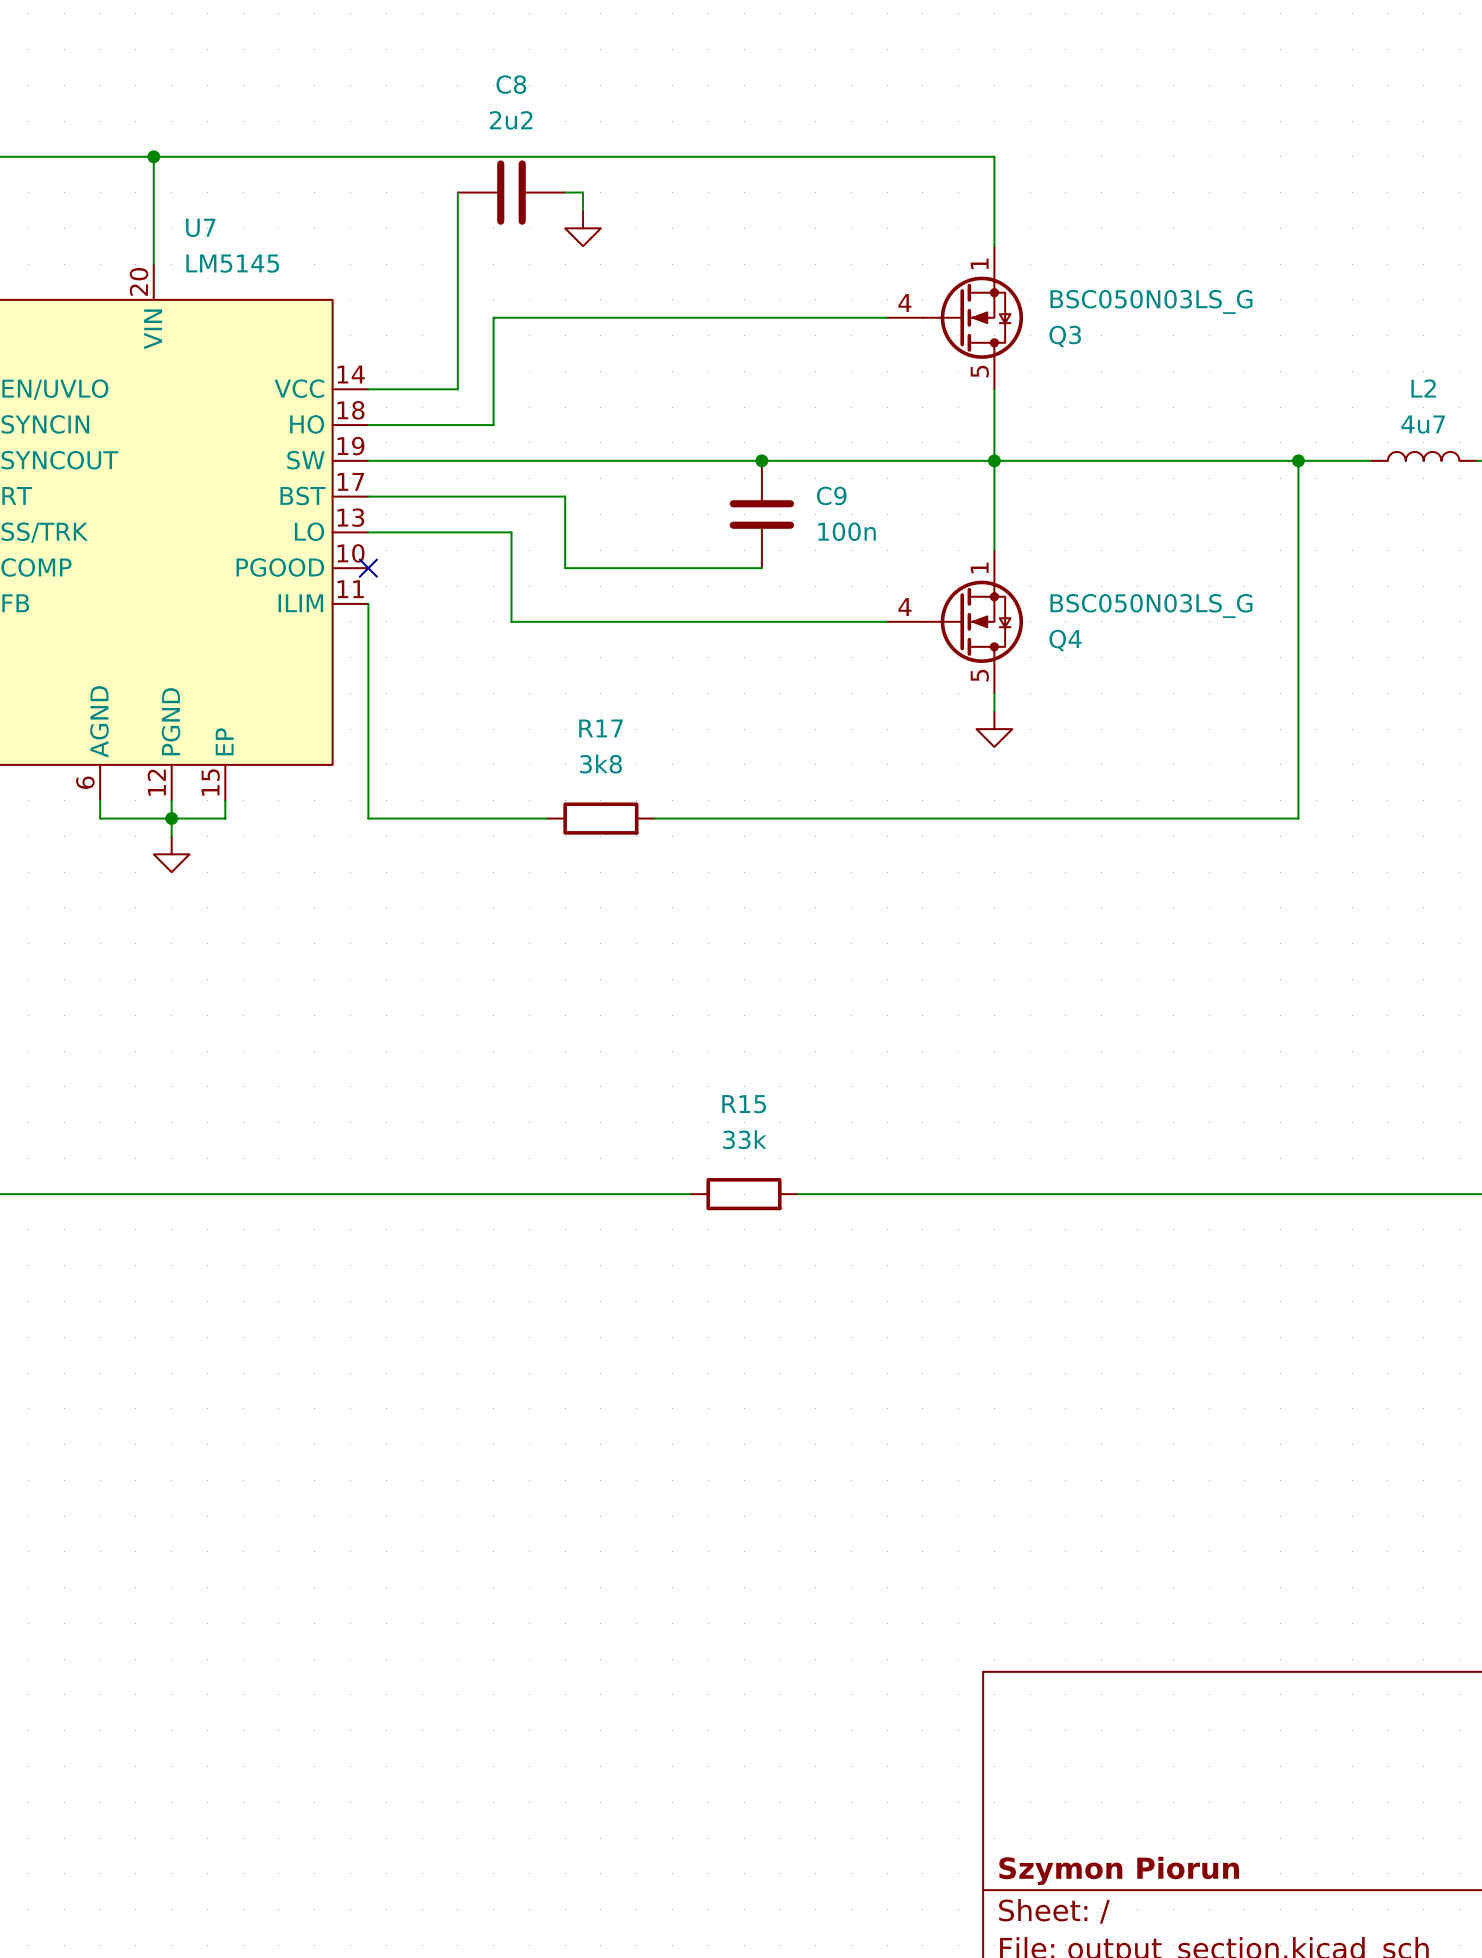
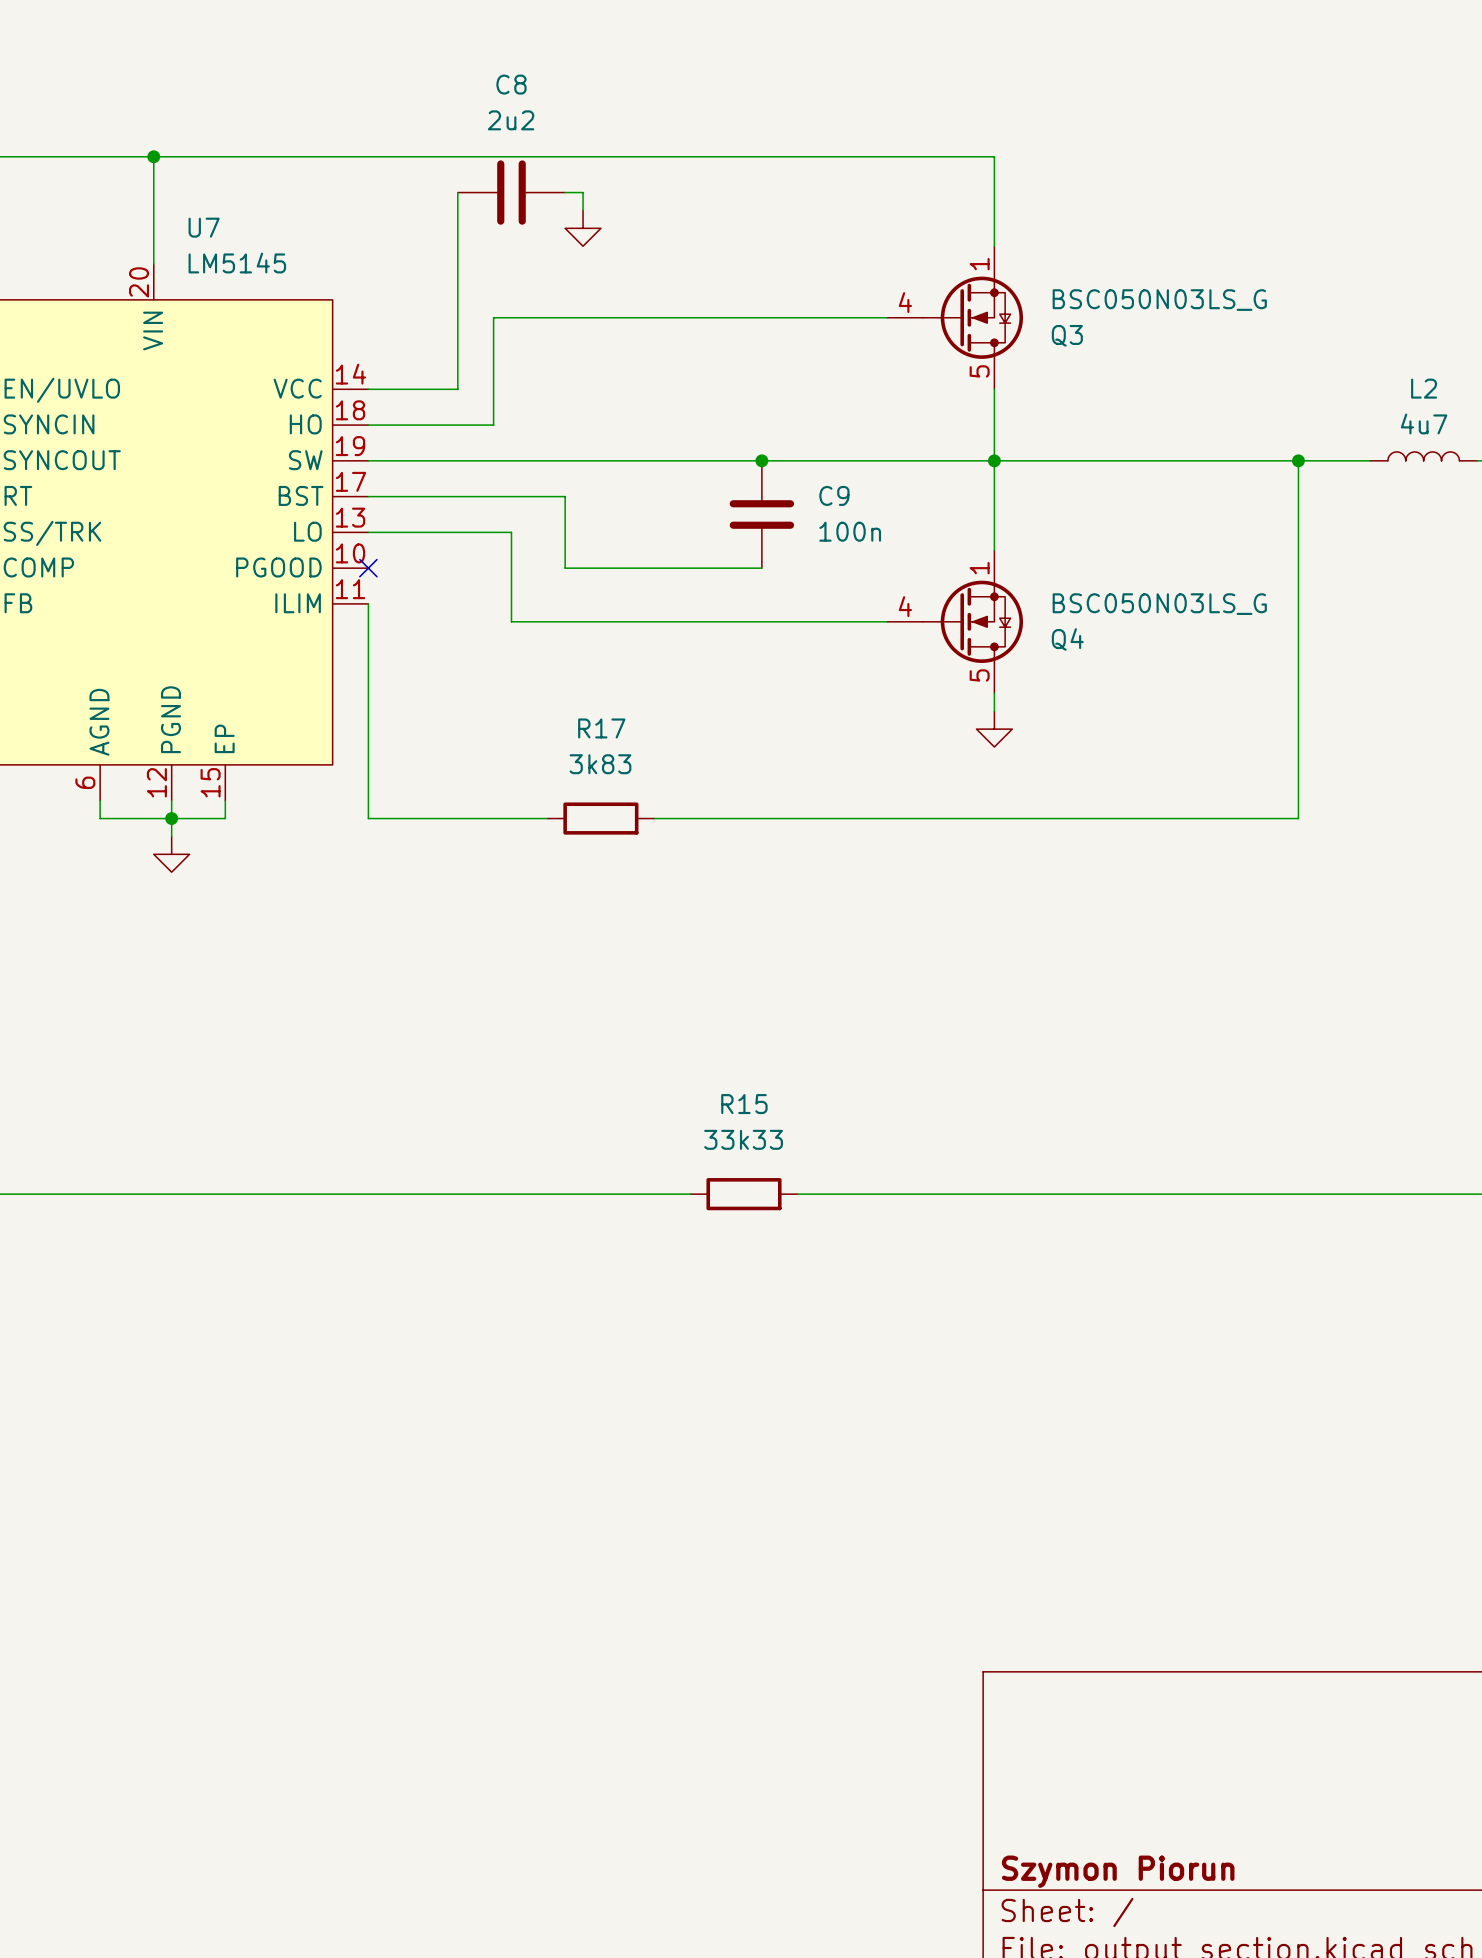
R17 value: 3k8 (601, 764) -> 3k83 (600, 764)
R15 value: 33k (744, 1139) -> 33k33 (743, 1139)

